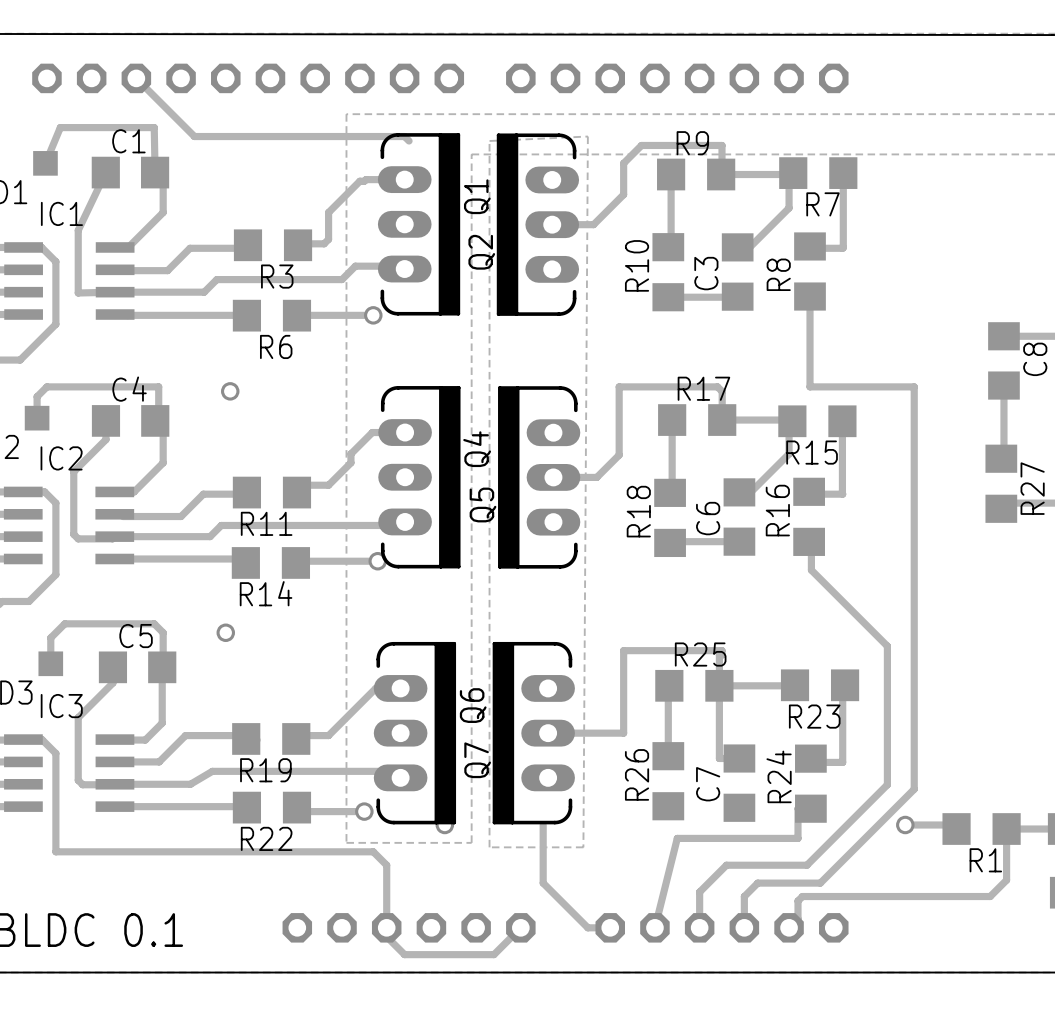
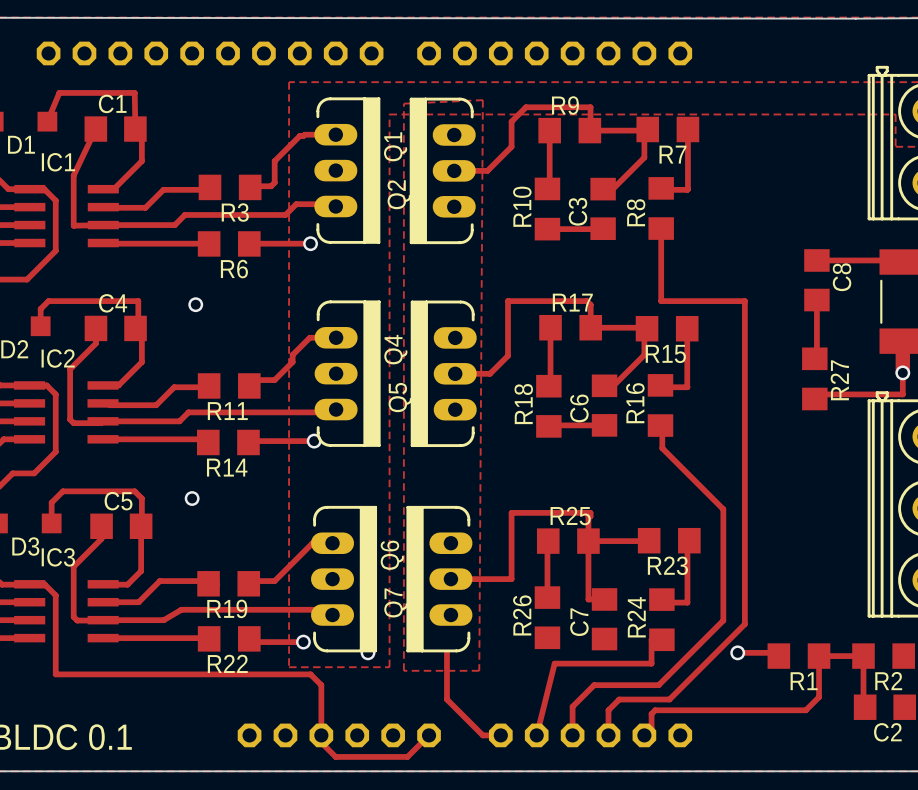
track: (136, 78) (194, 136) (404, 136) (409, 141) -> none

